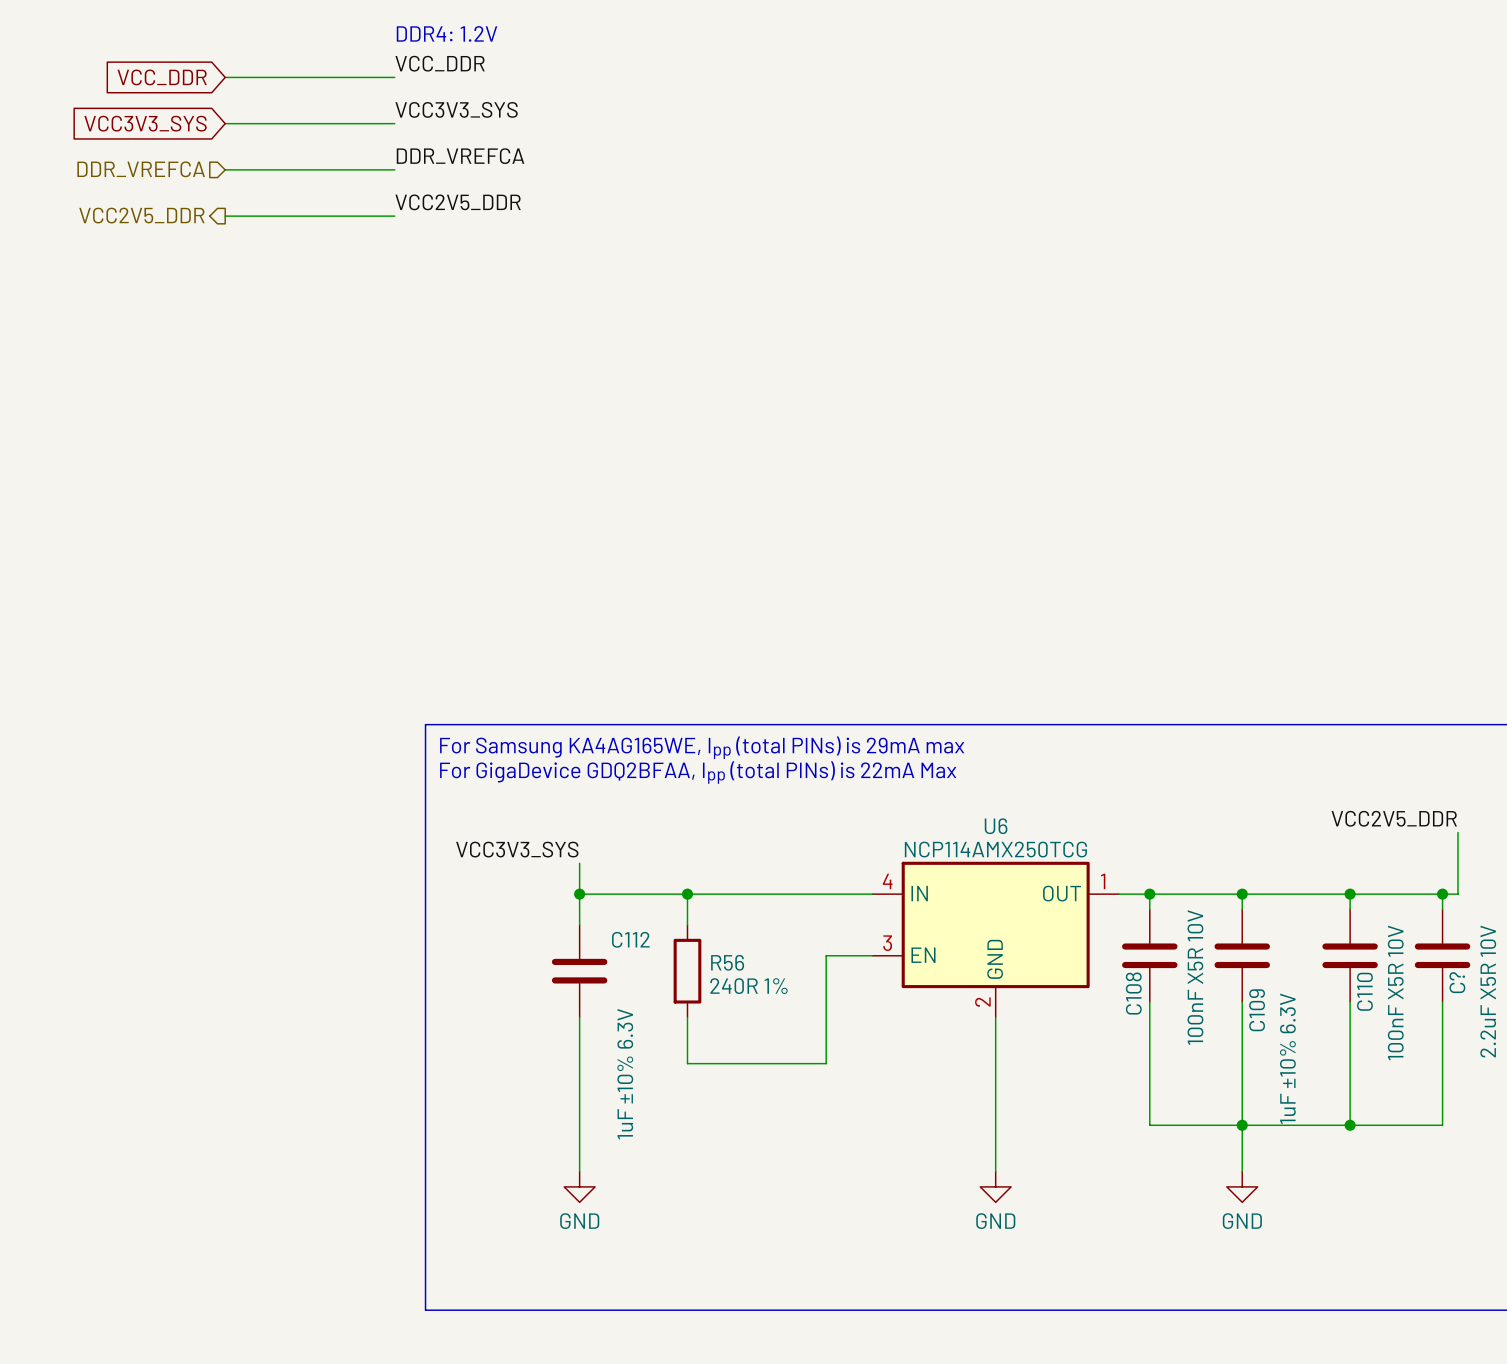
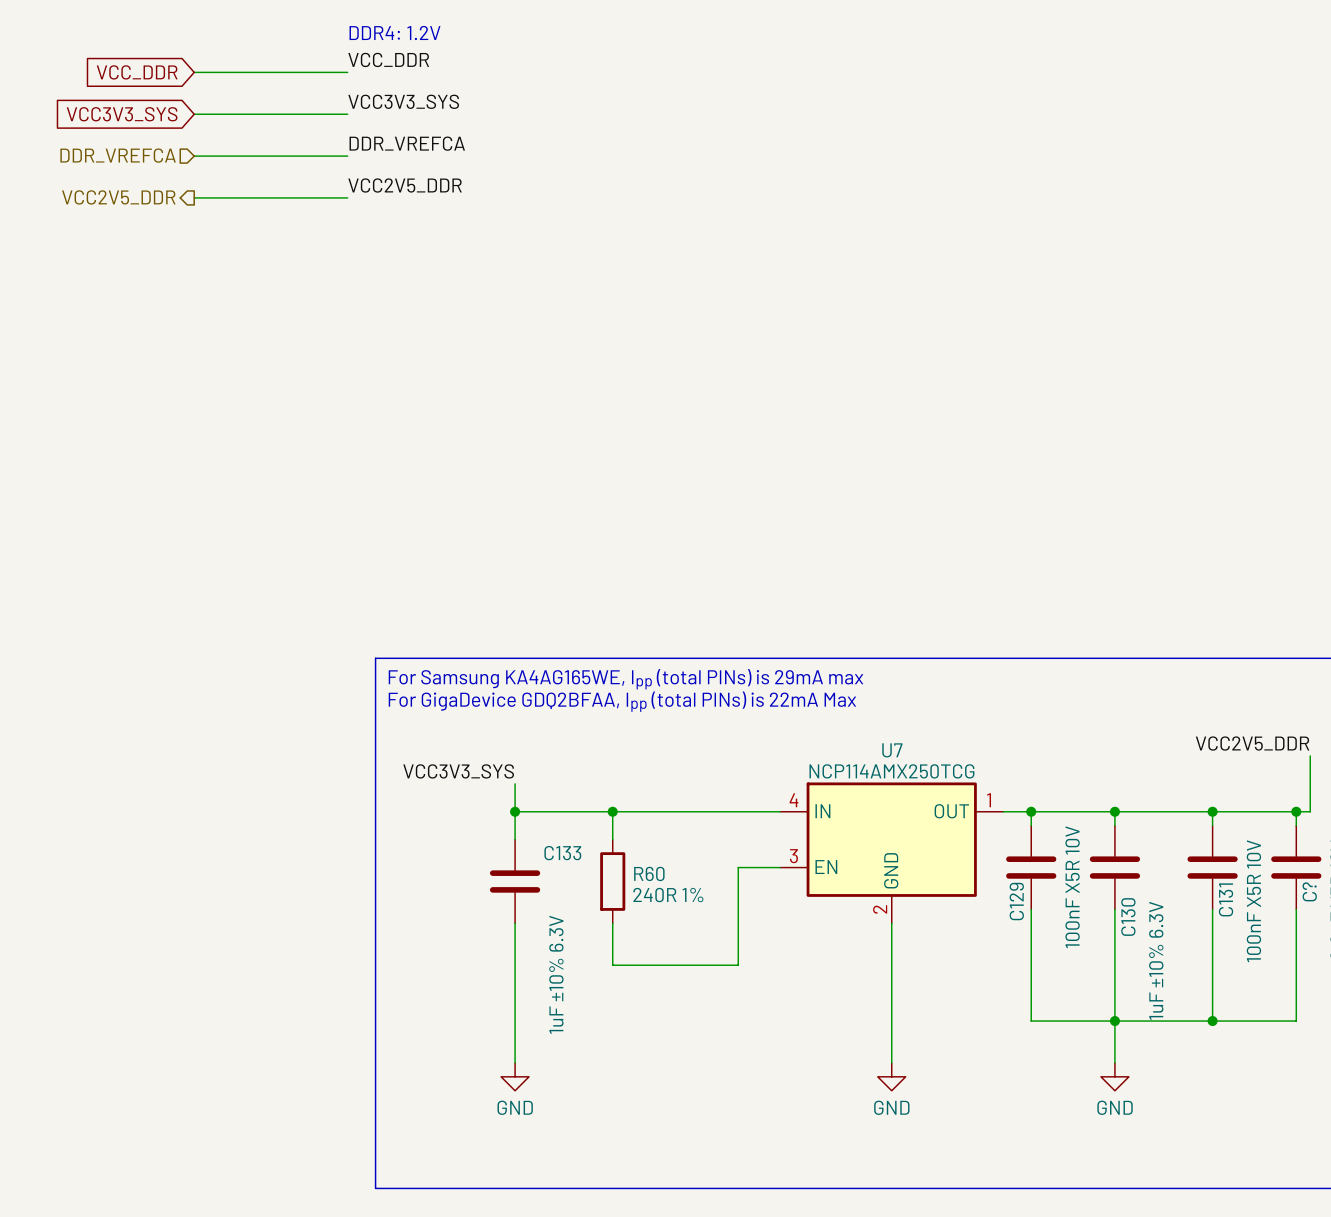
U6 name: U6 (996, 826) -> U7 (892, 750)
C112 name: C112 (630, 939) -> C133 (562, 853)
R56 name: R56 (727, 962) -> R60 (649, 873)
C110 name: C110 (1364, 991) -> C131 (1226, 899)
C108 name: C108 (1133, 993) -> C129 (1016, 901)
C109 name: C109 (1257, 1010) -> C130 (1128, 917)

